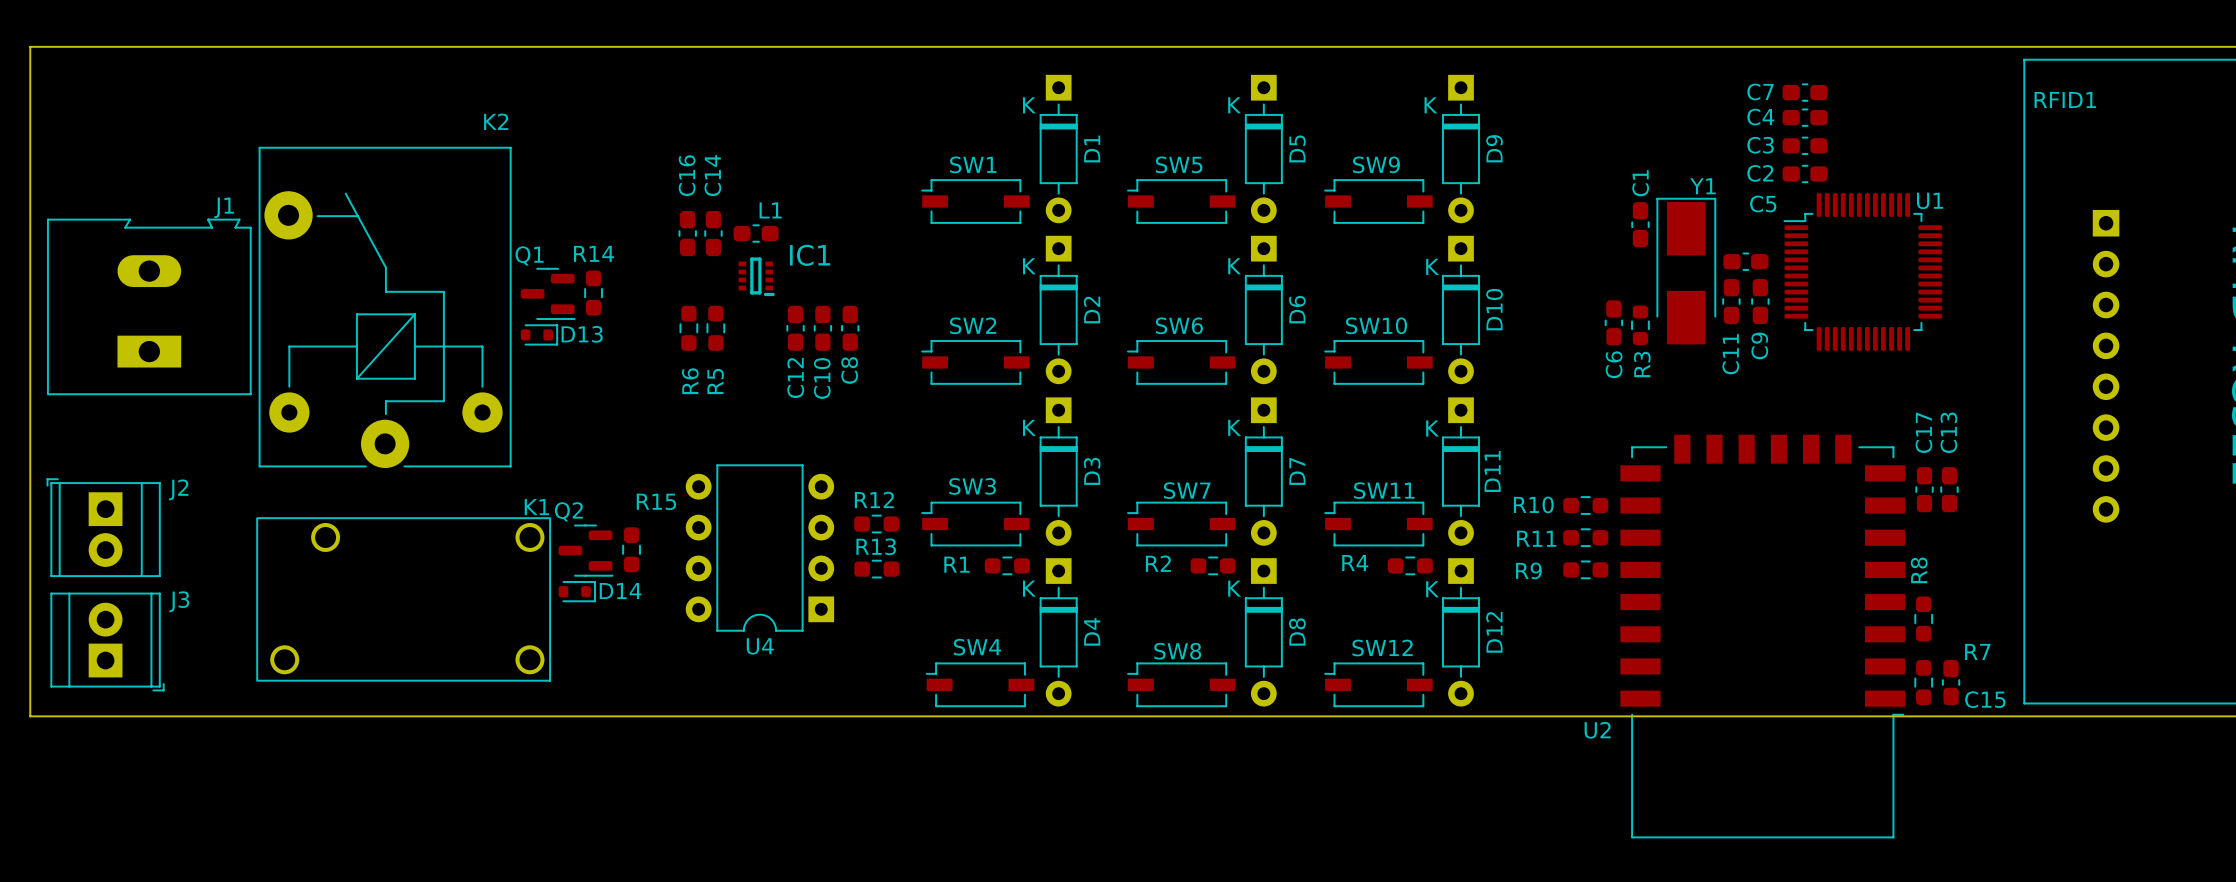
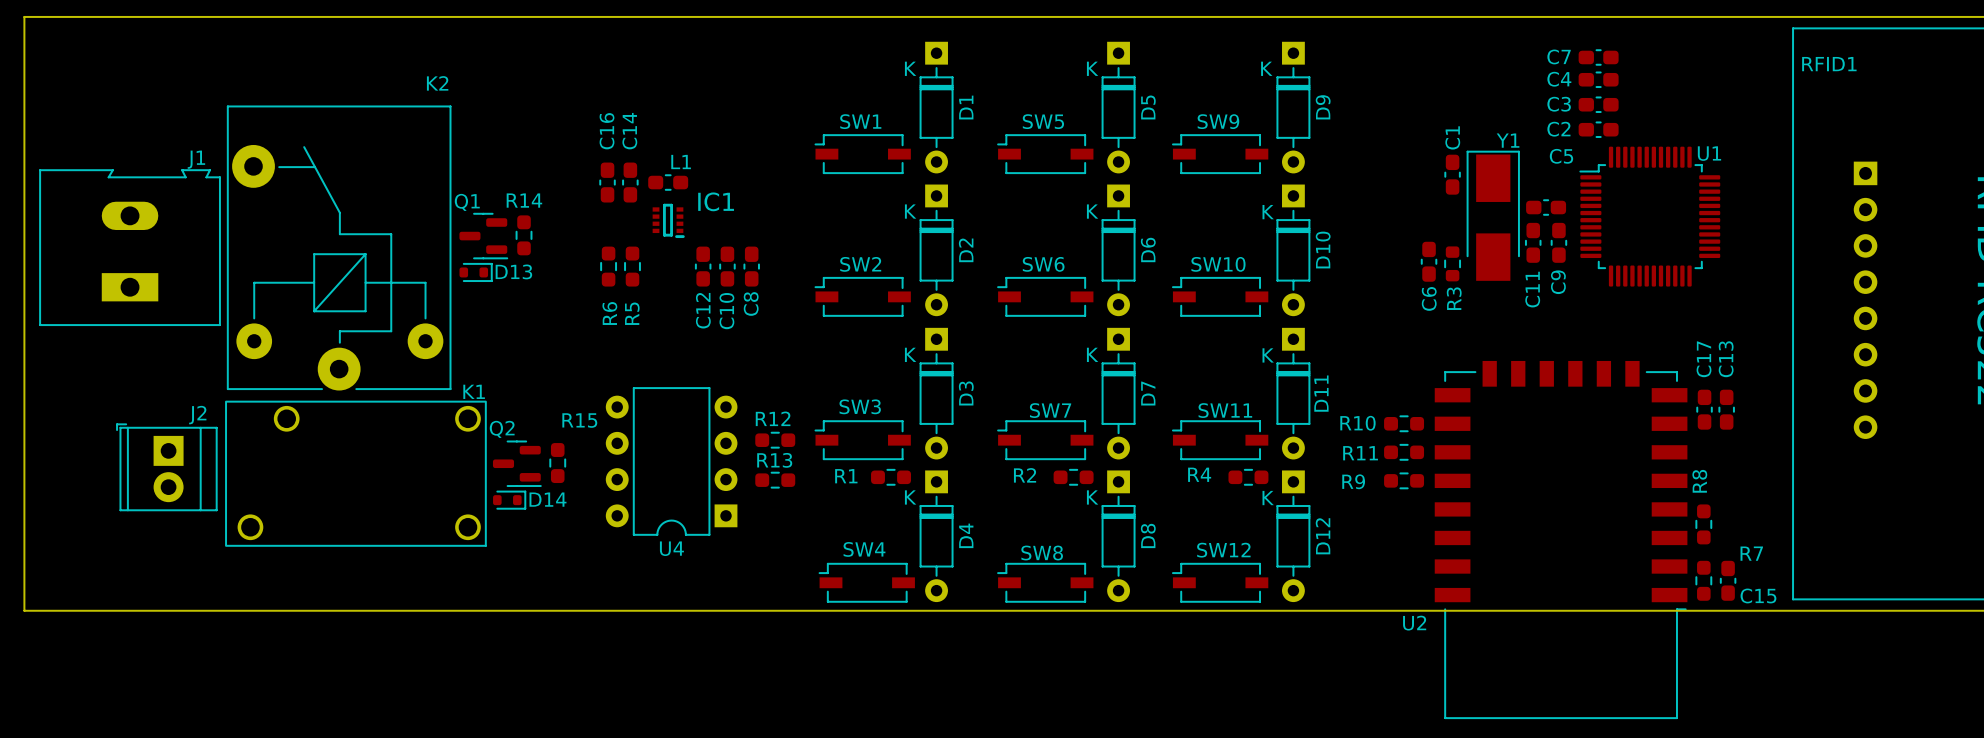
J2 name position: J2 (178, 489) -> J2 (197, 415)
J2 position: (103, 527) -> (166, 467)
K1 position: (403, 599) -> (355, 473)
J3: (107, 642) -> none

